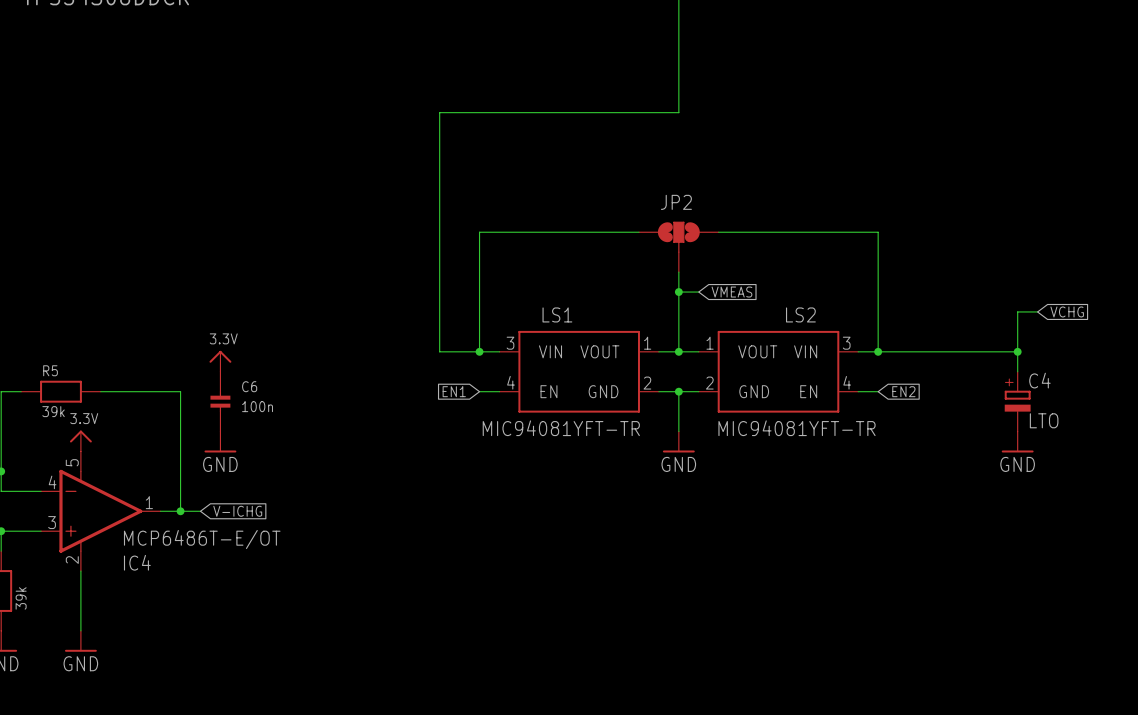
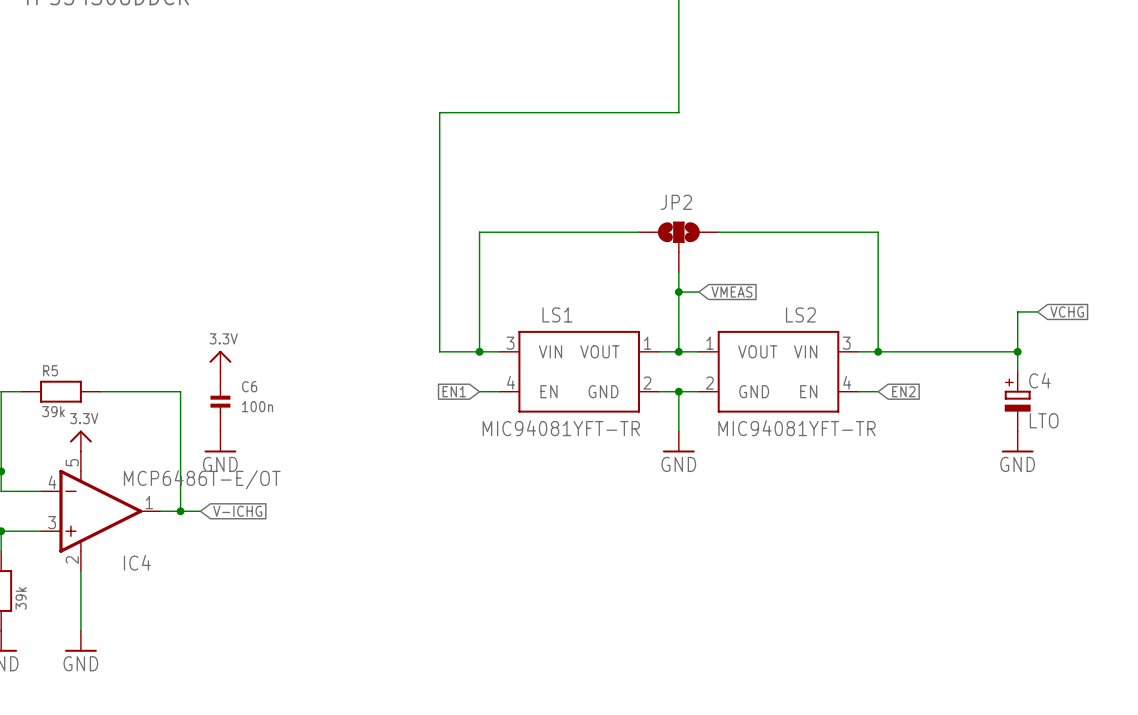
IC4 value position: MCP6486T-E/OT (202, 539) -> MCP6486T-E/OT (202, 479)

